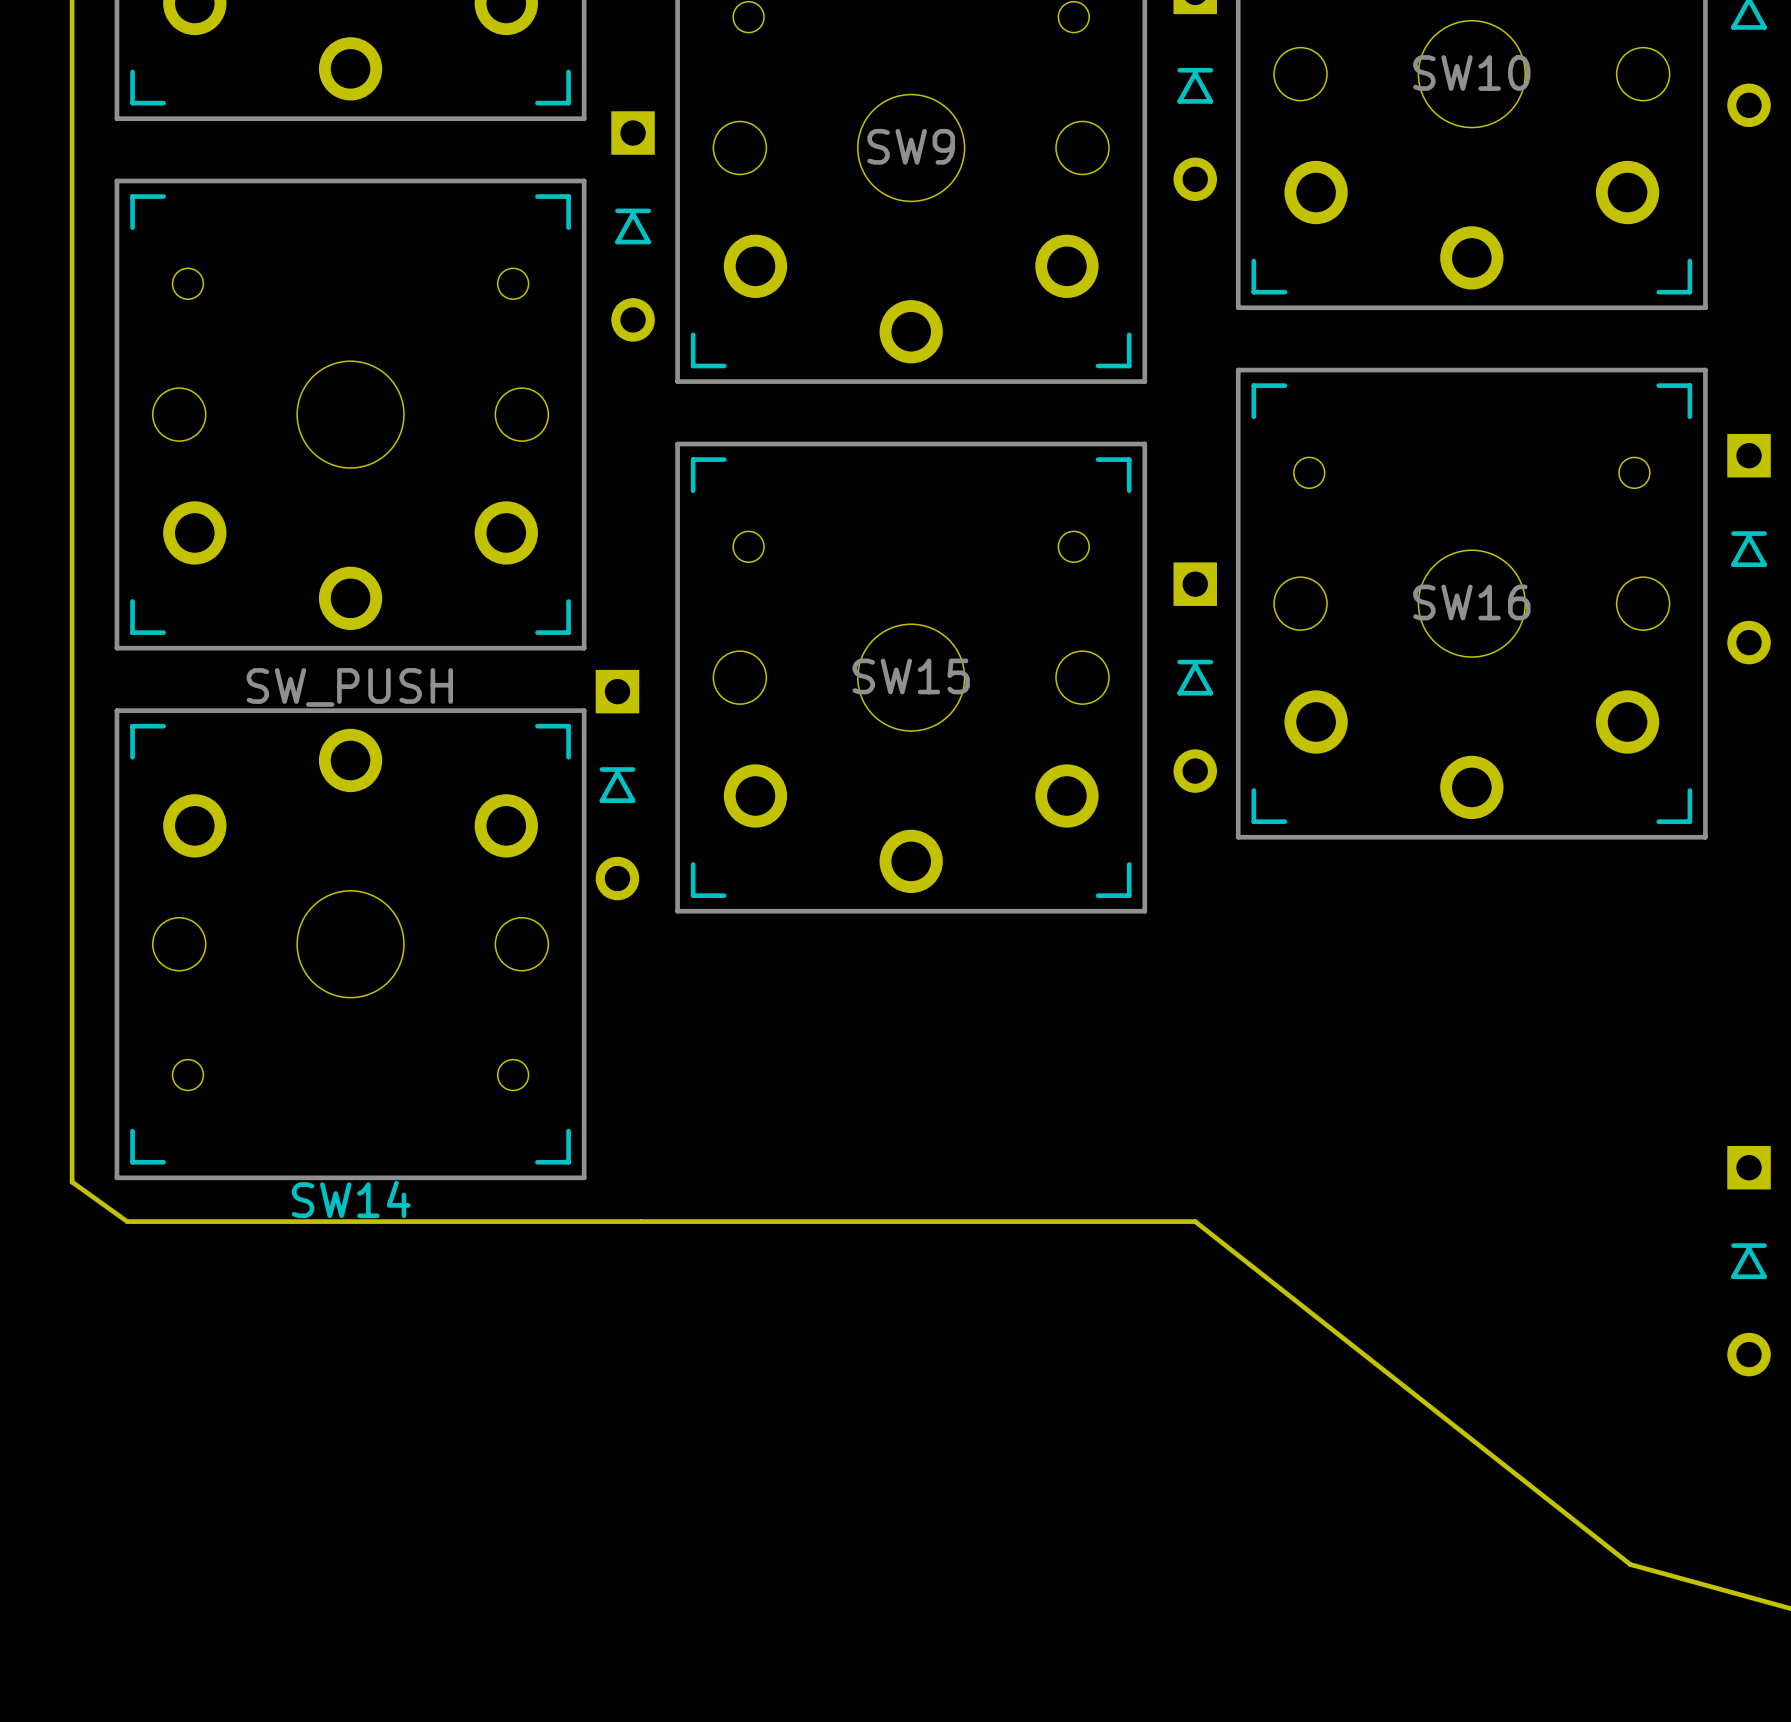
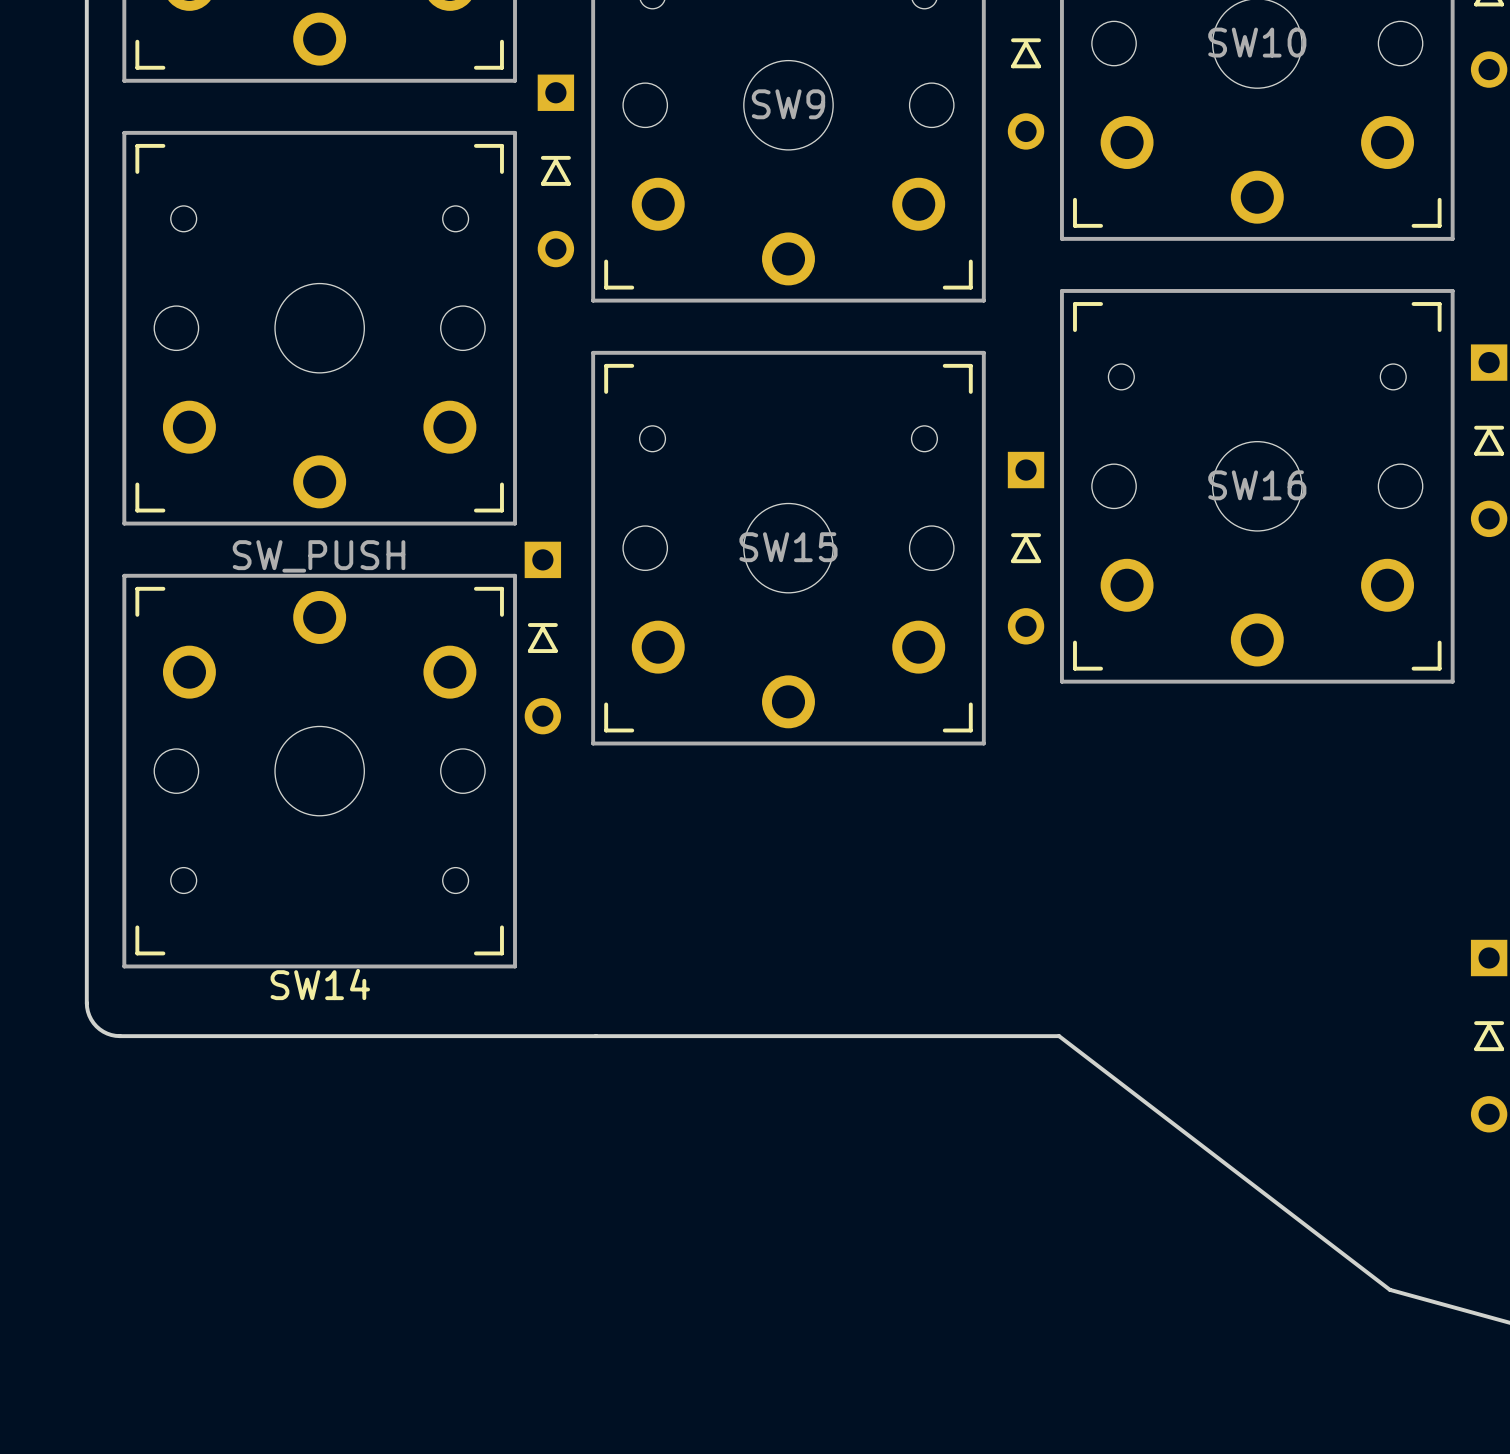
board edge: (72, 1182) (127, 1221) (1195, 1221) (1630, 1564) -> (86, 969) (86, 1003) (89, 1015) (99, 1029) (115, 1035) (1059, 1036) (1389, 1289)

